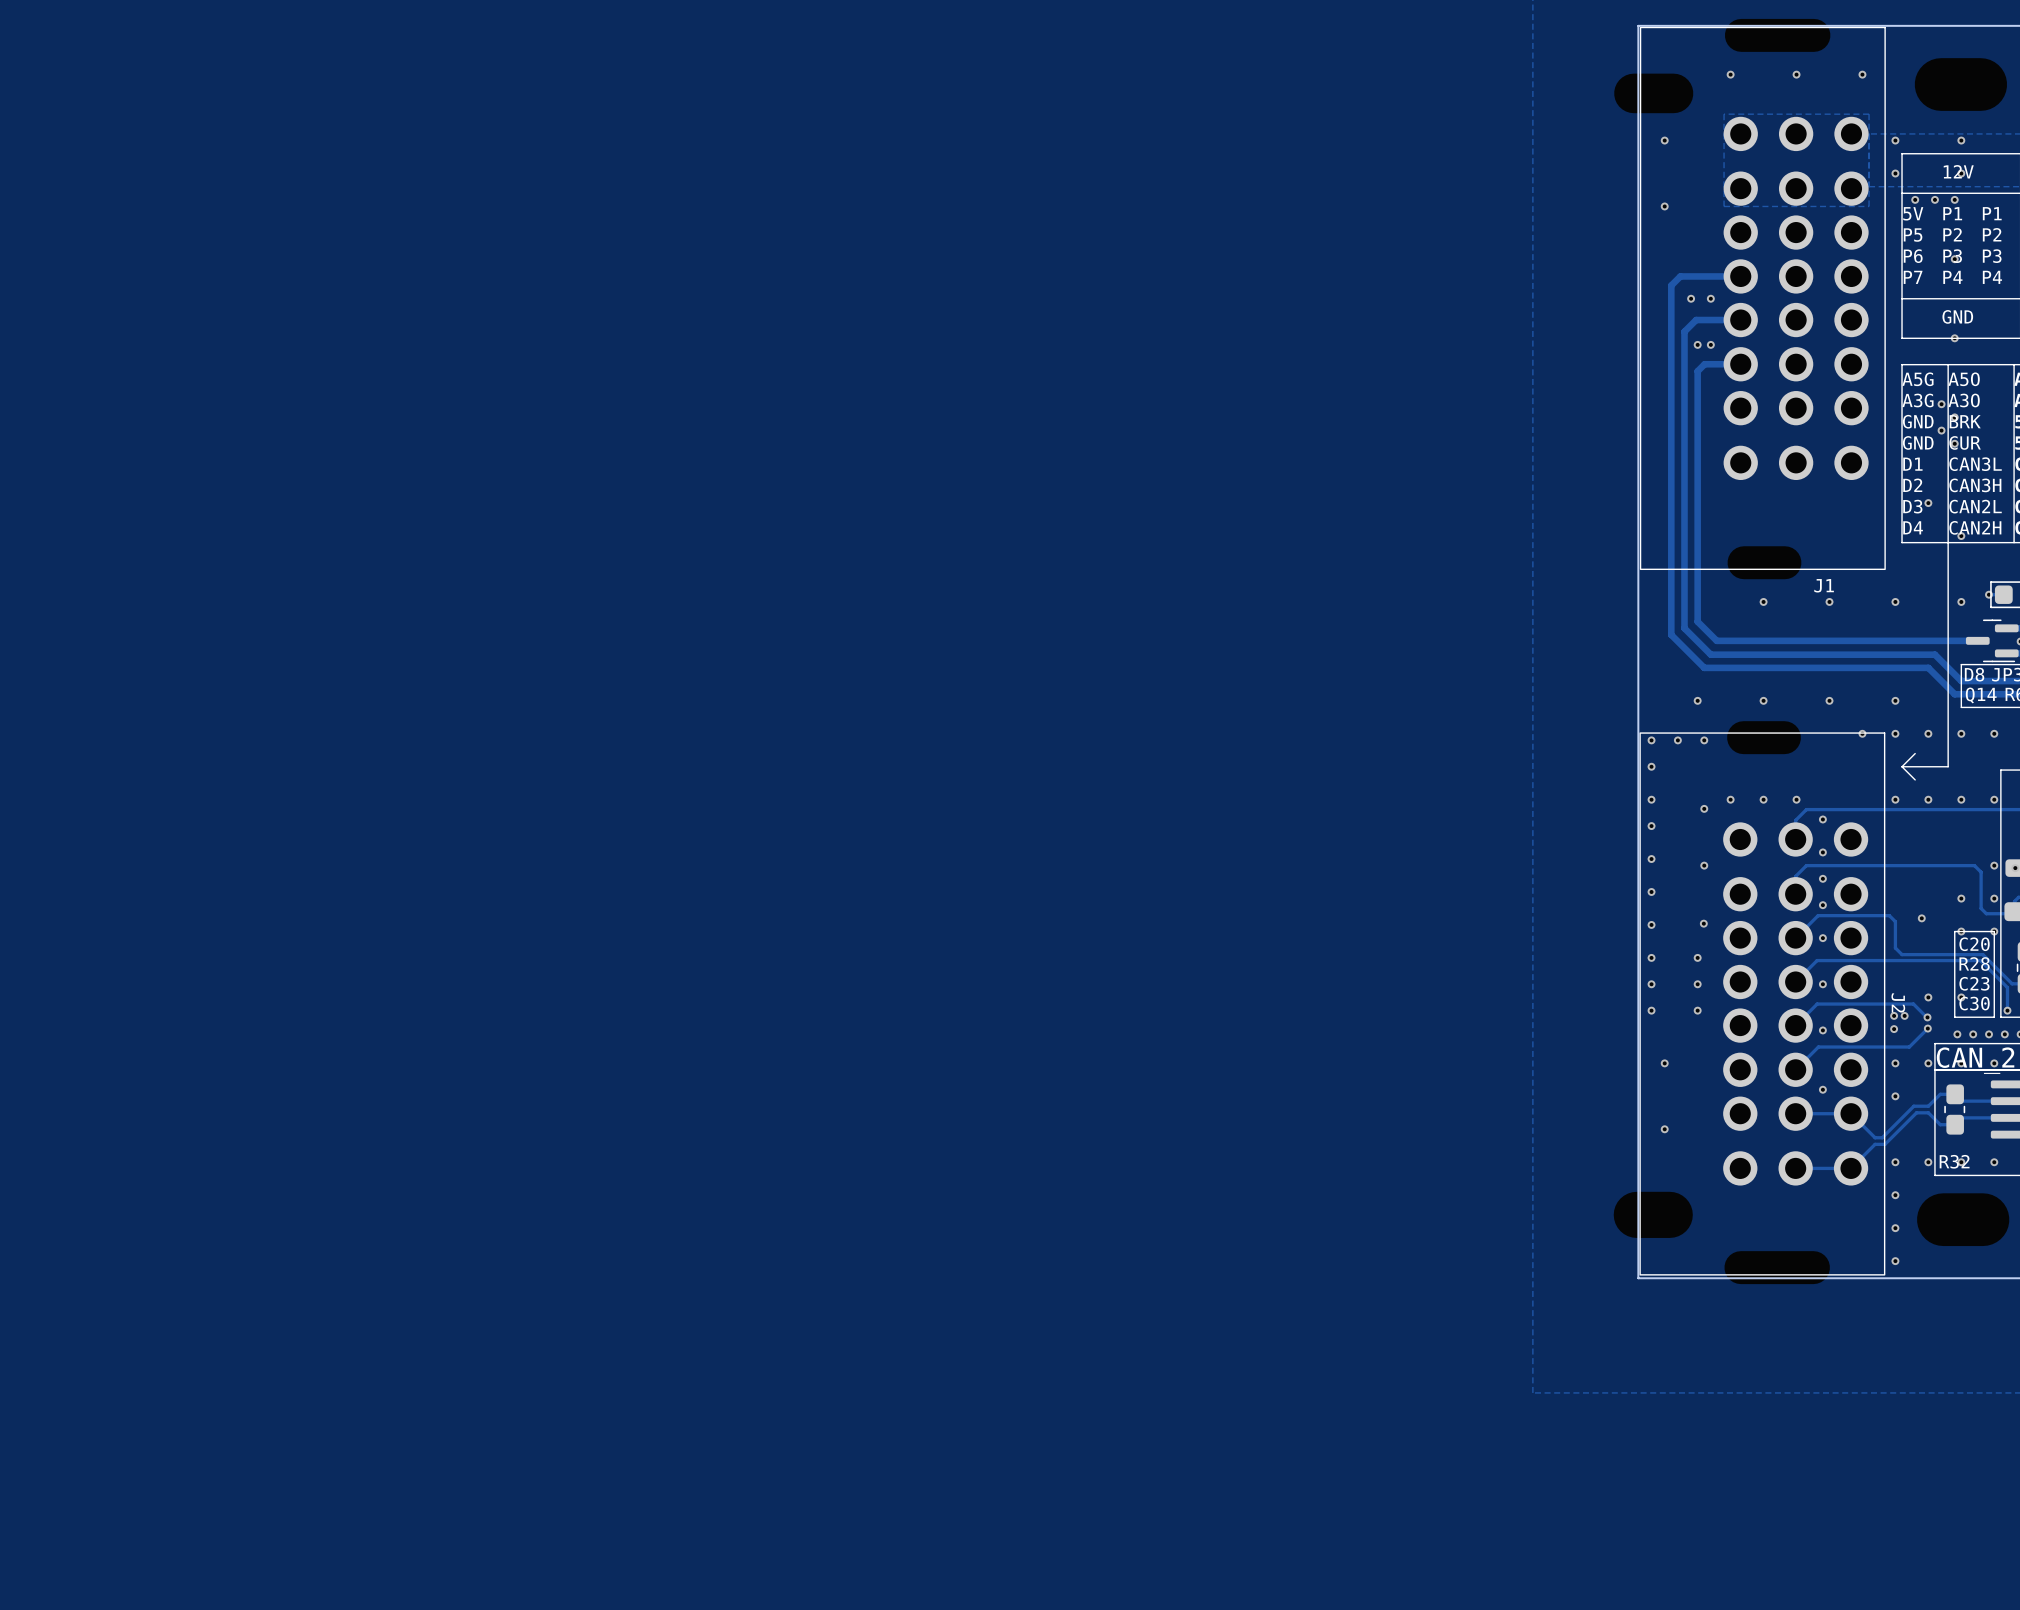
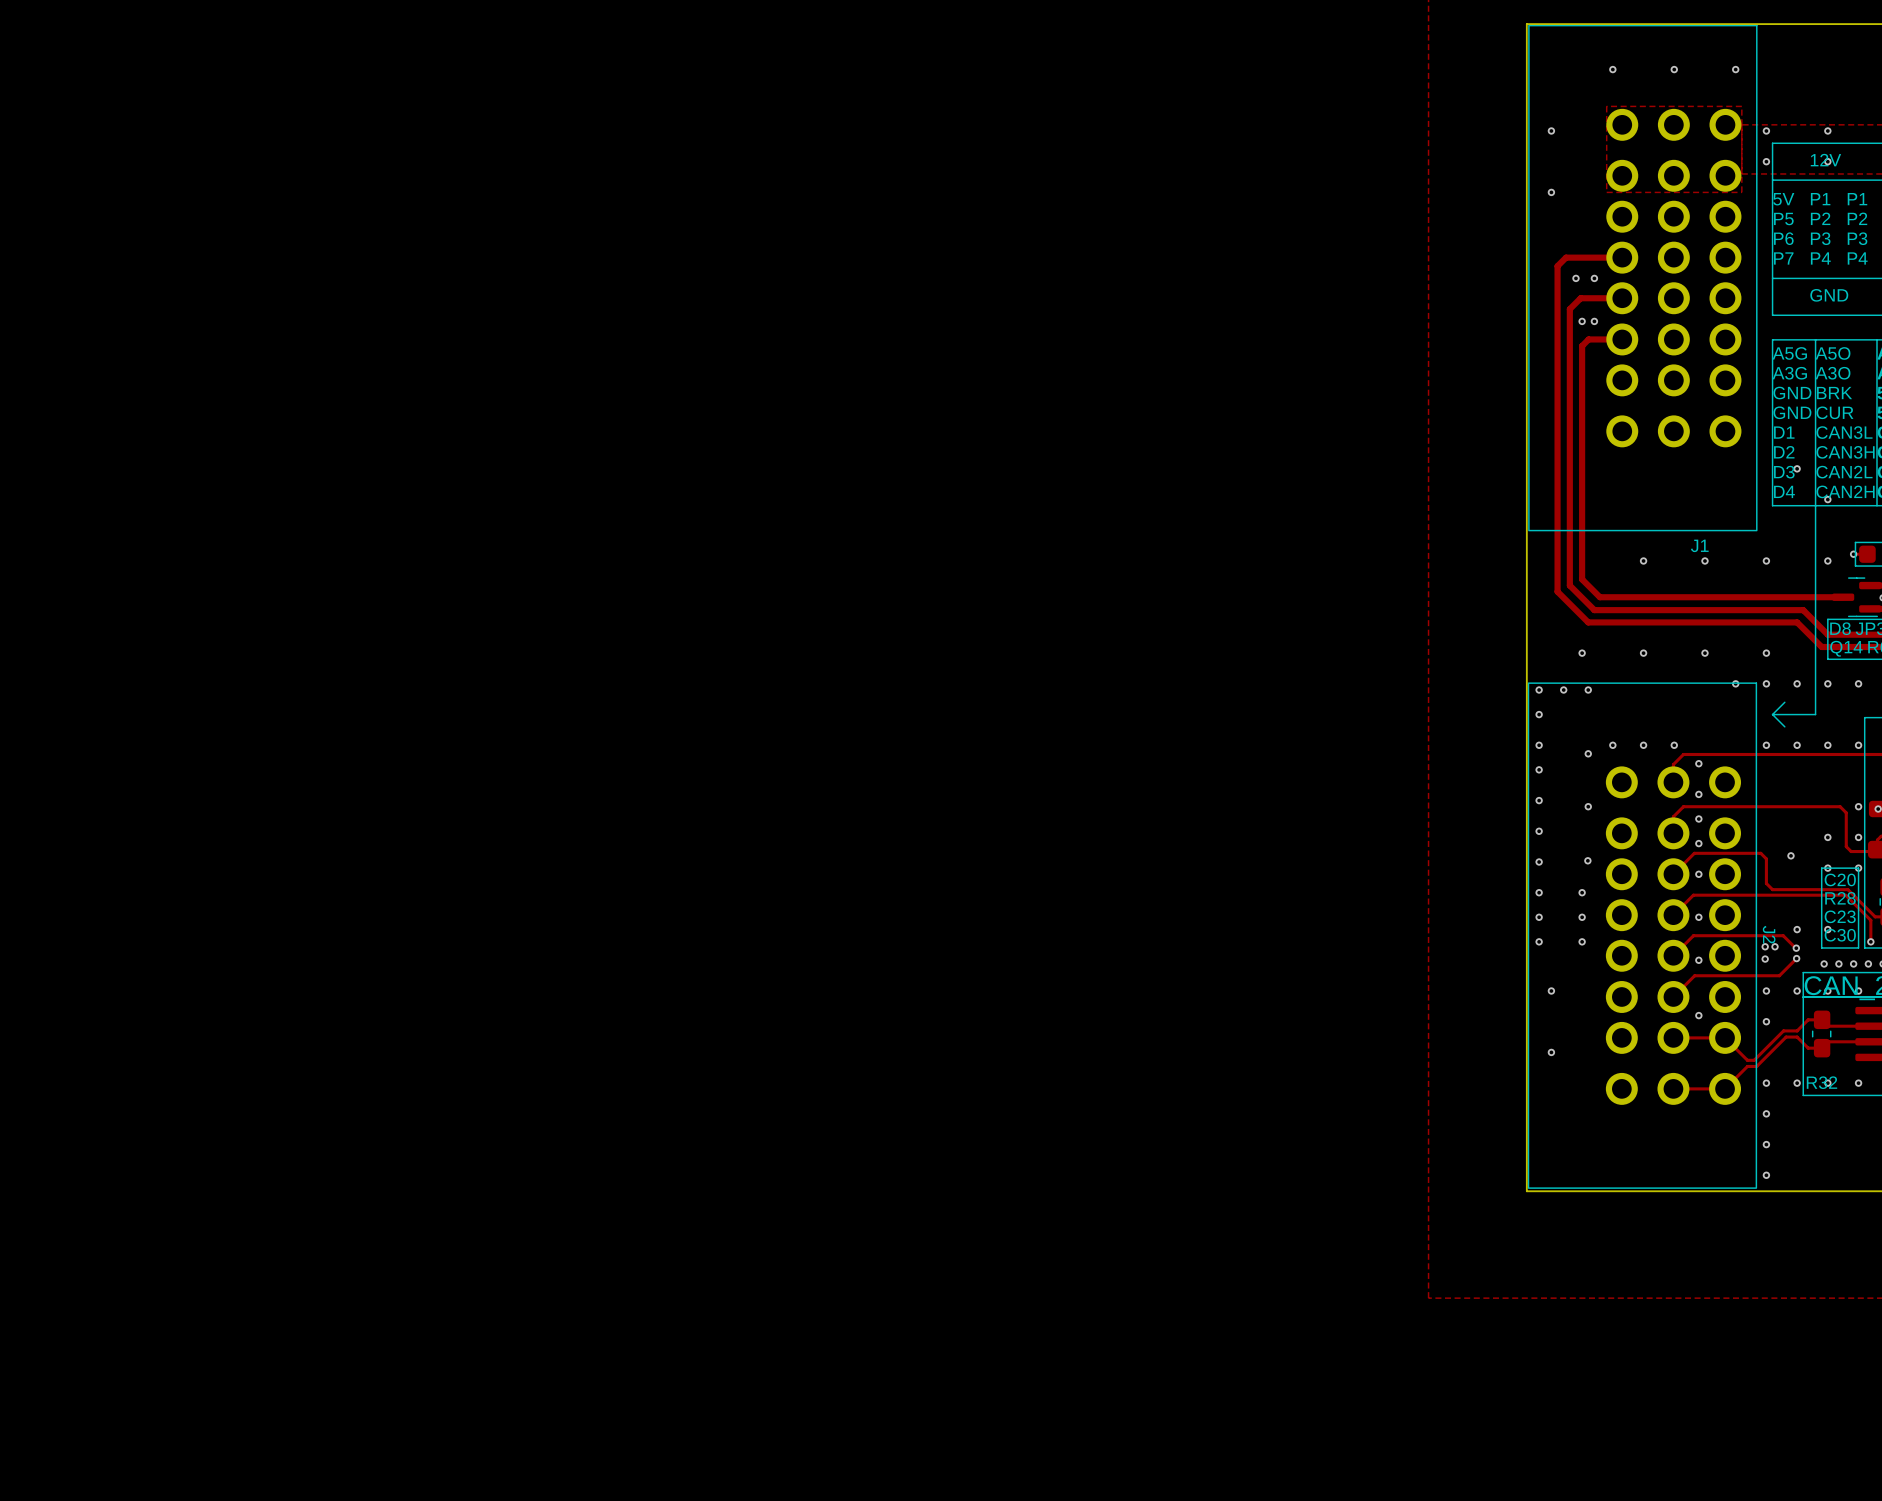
via: (1915, 199) -> none
via: (1934, 199) -> none
via: (1954, 199) -> none
via: (1954, 259) -> none
via: (1954, 338) -> none
via: (1941, 404) -> none
via: (1954, 417) -> none
via: (1941, 430) -> none
via: (1954, 443) -> none

